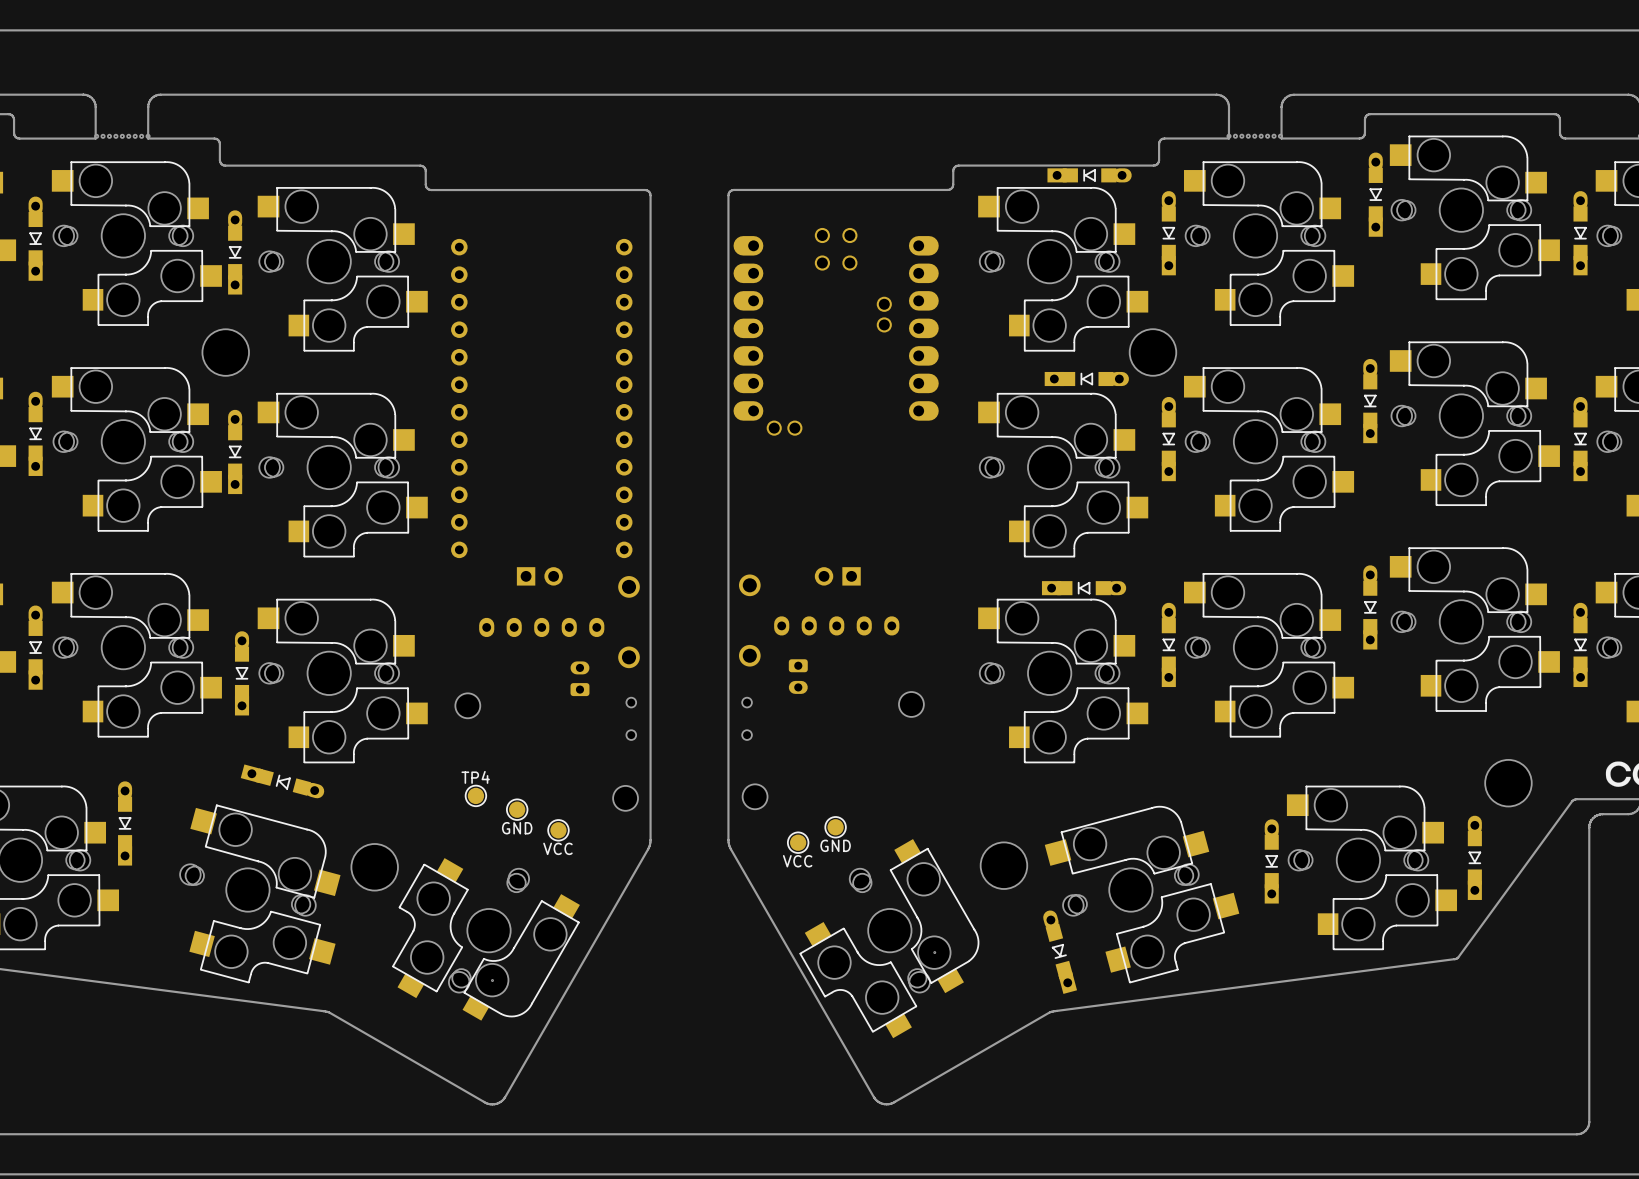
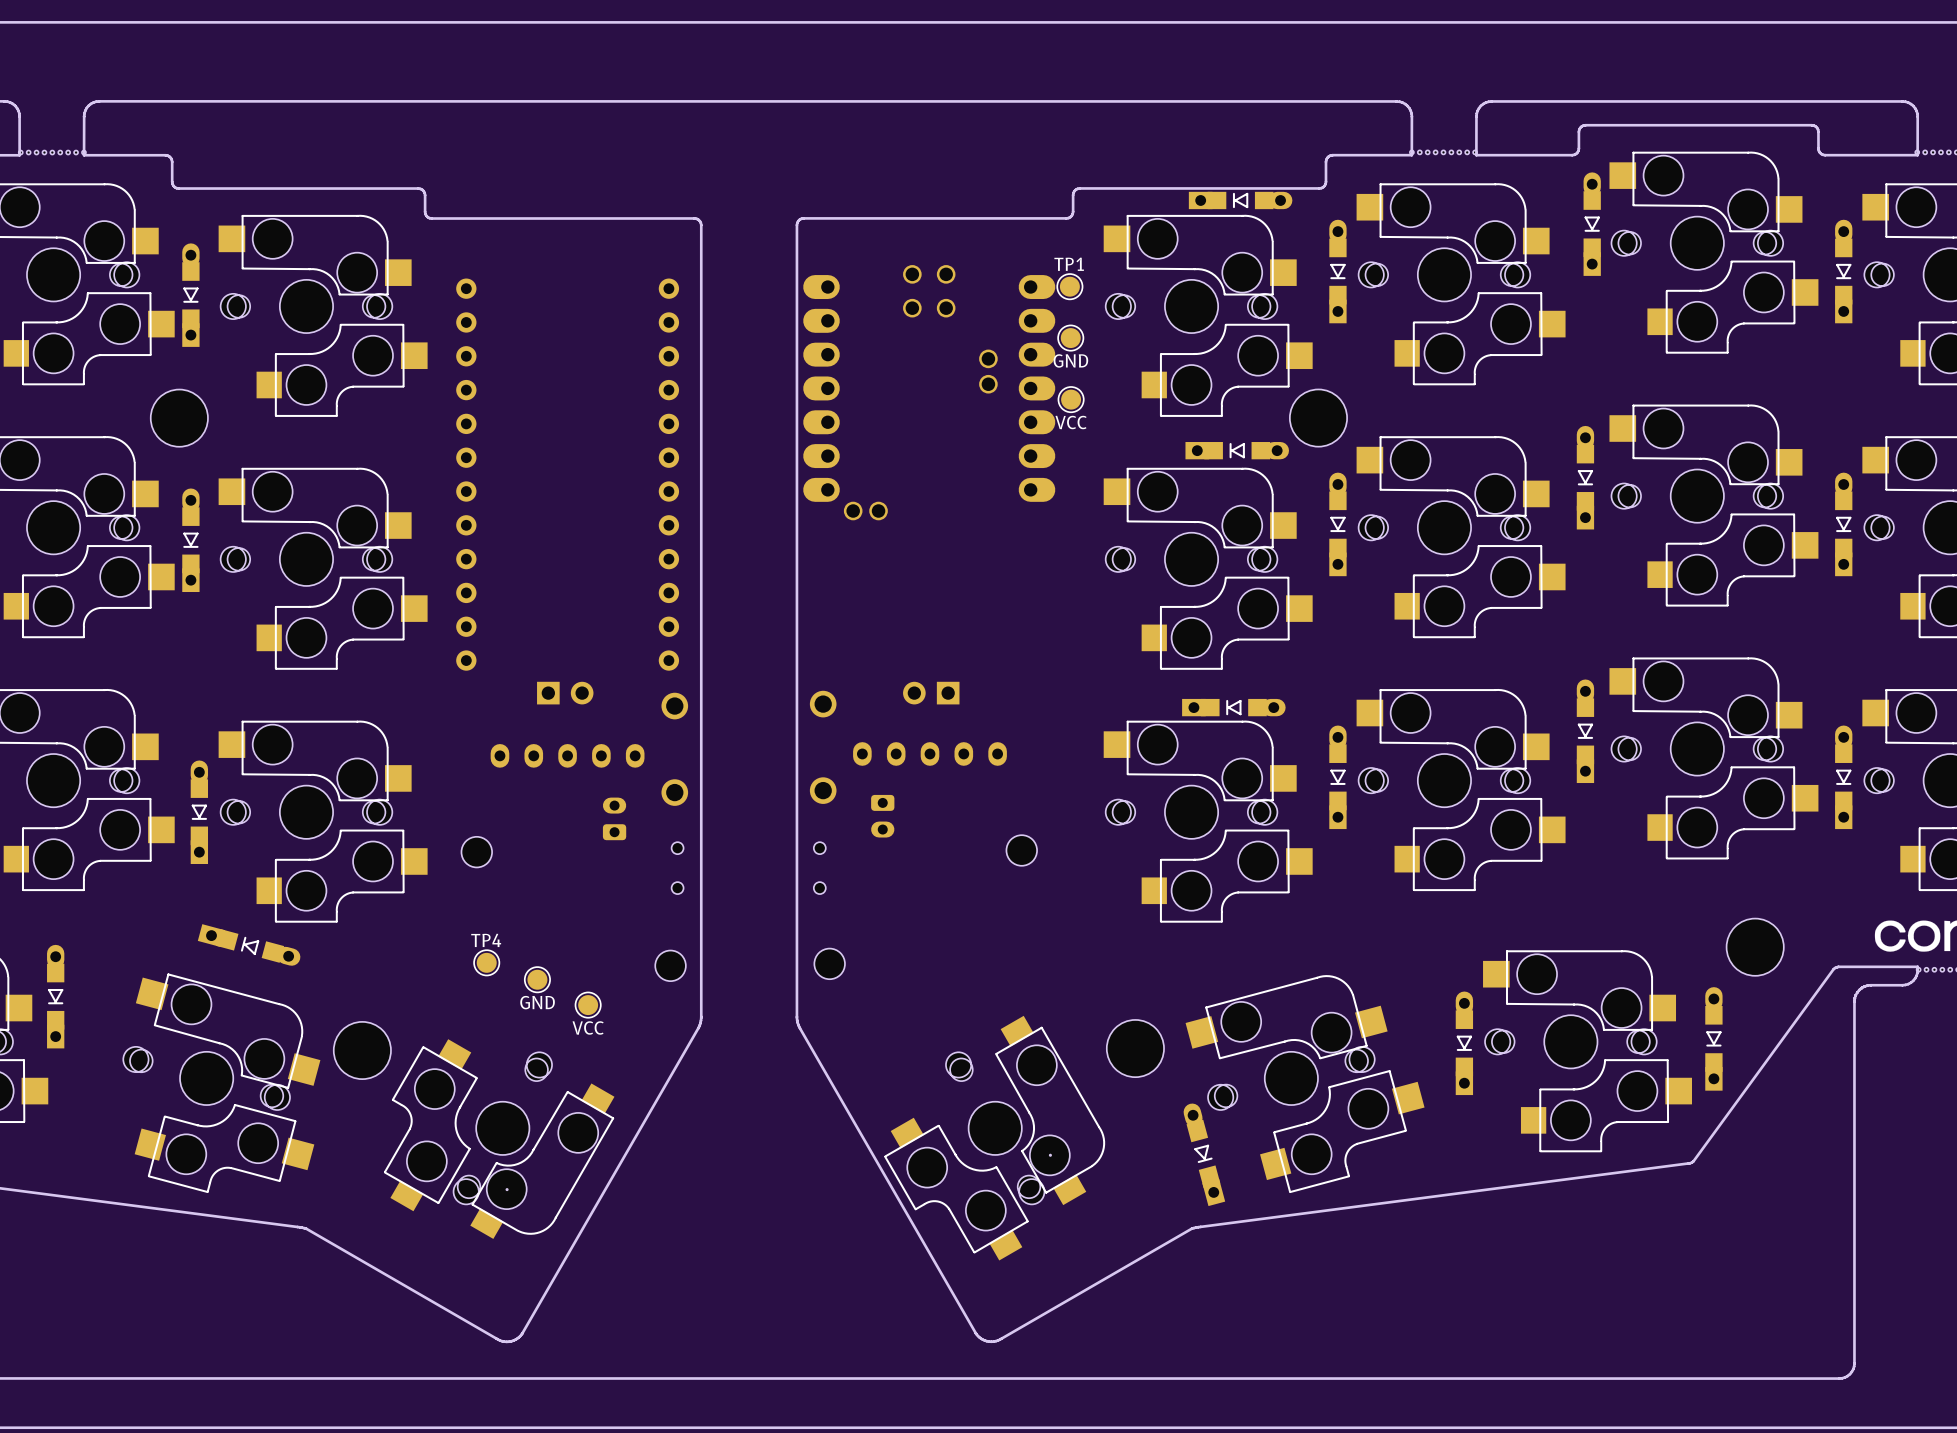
TP1: none -> (1069, 286)
part: none -> GND (1070, 338)
part: none -> VCC (1071, 399)
part: GND (835, 827) -> none
part: VCC (798, 842) -> none

